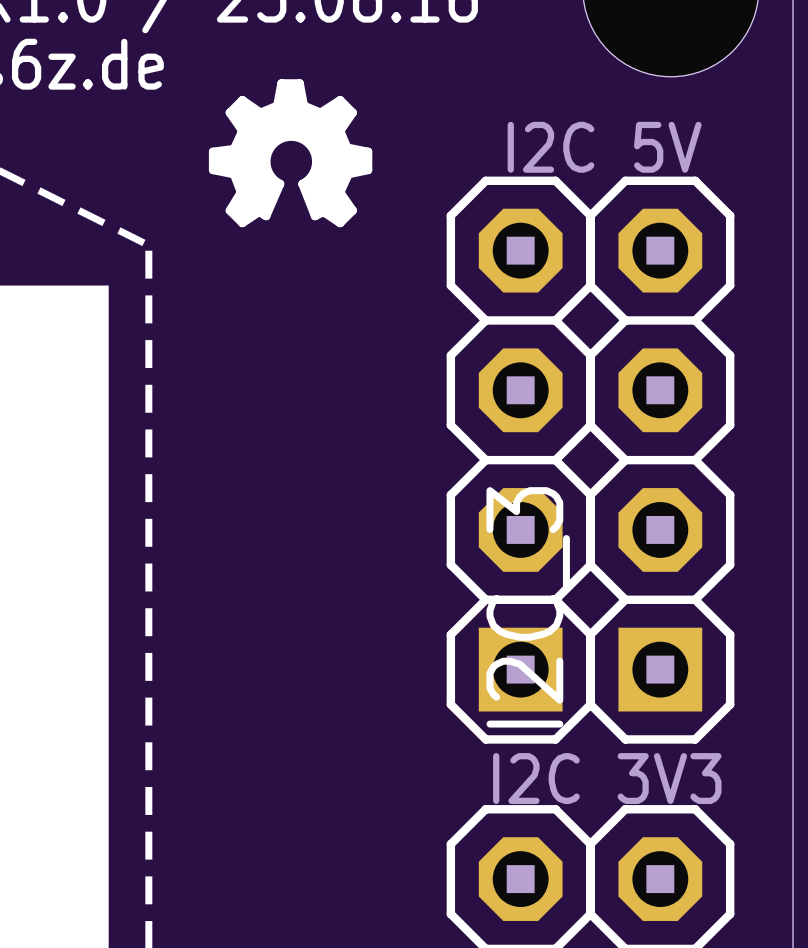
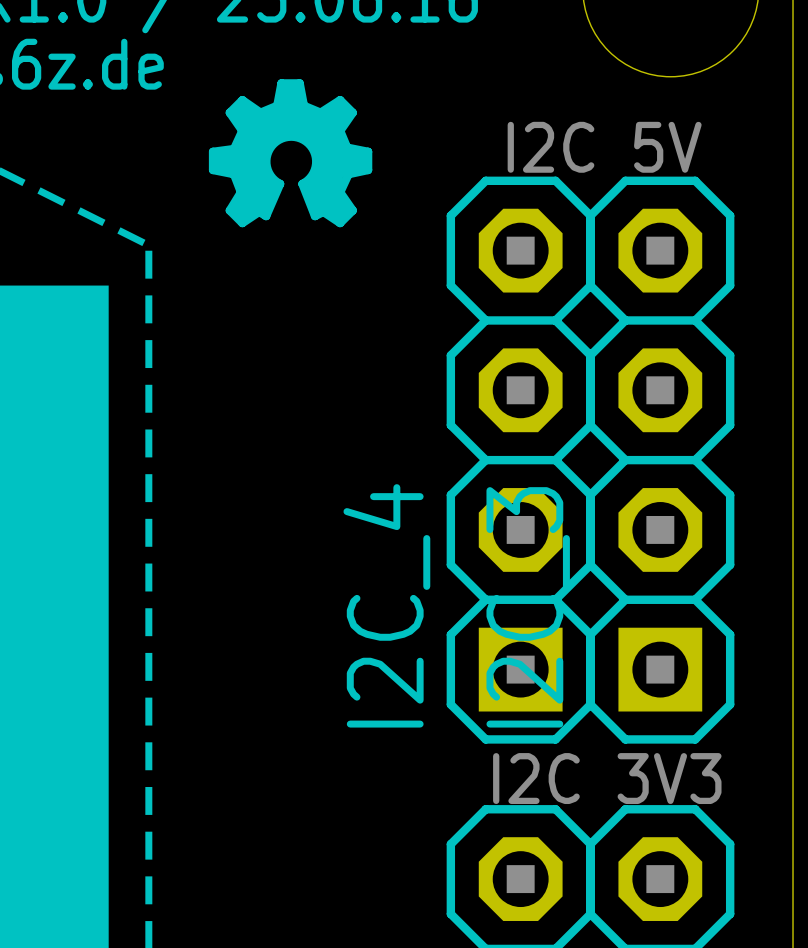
I2C_4 name: none -> I2C_4 (386, 605)

